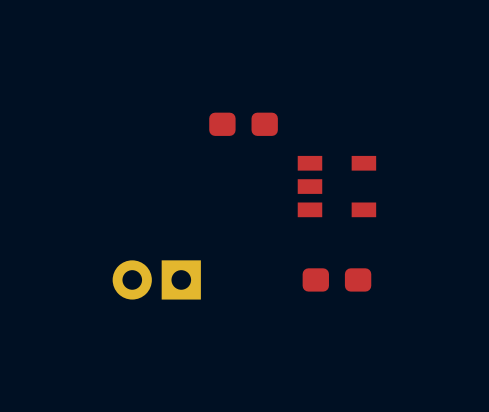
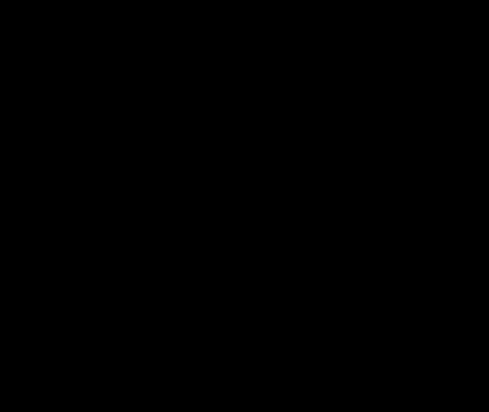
part: (243, 124) -> none
part: (336, 186) -> none
part: (156, 279) -> none
part: (336, 279) -> none

